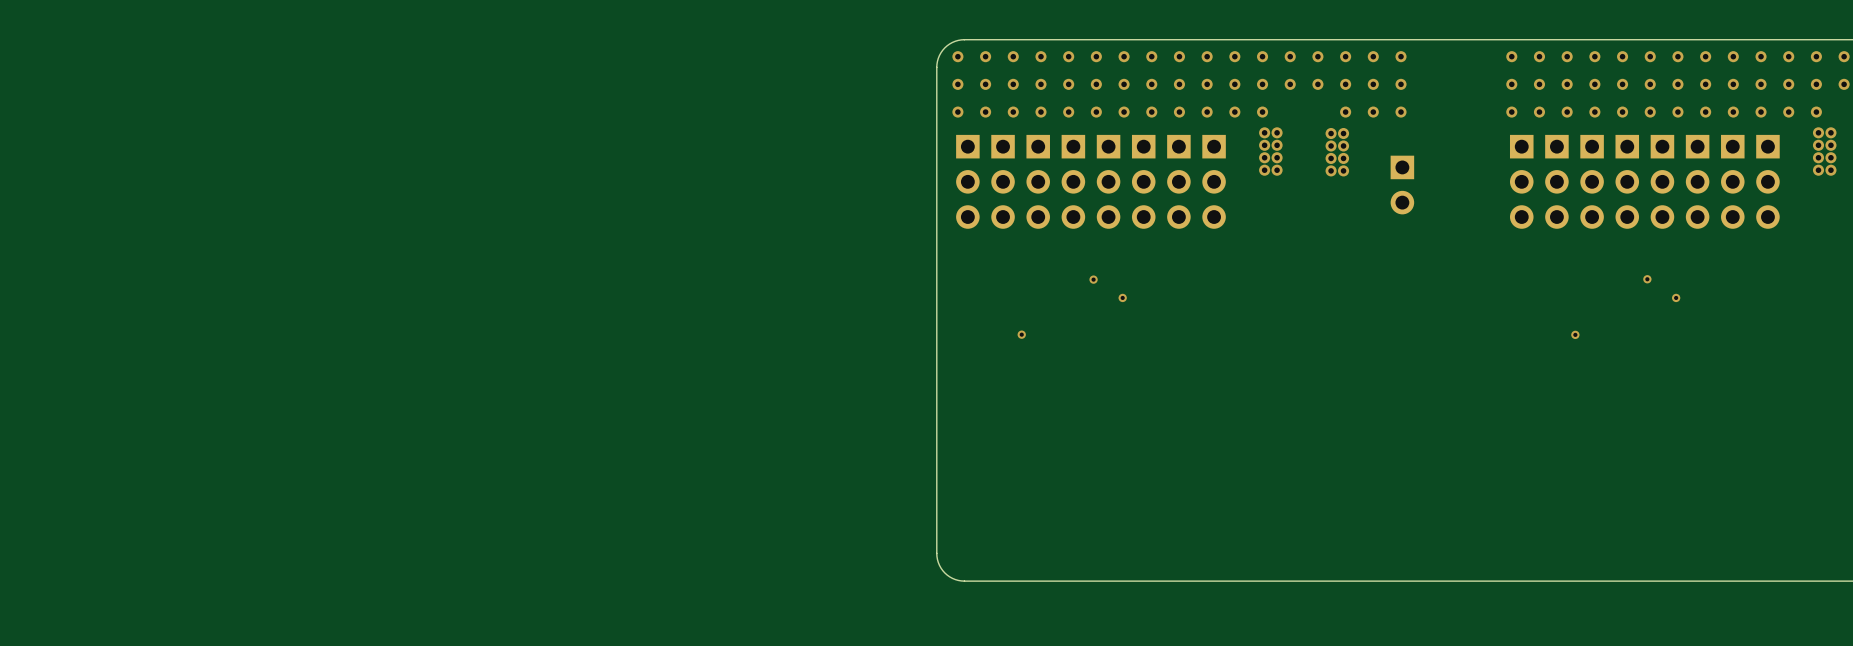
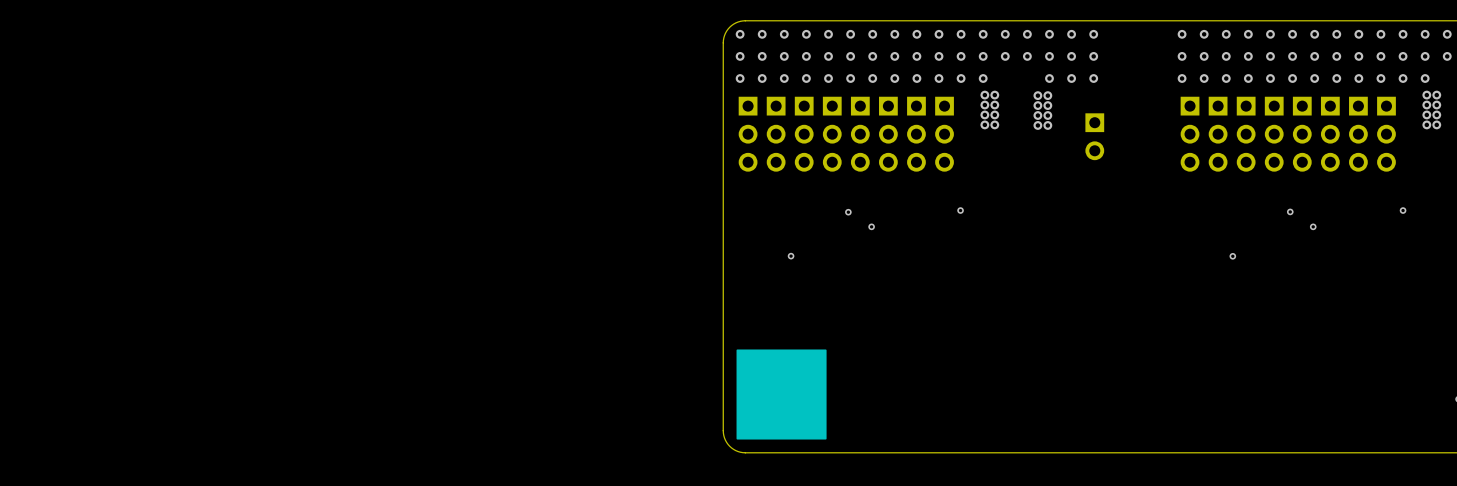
via: none -> (960, 210)
via: none -> (1403, 210)
drawing: none -> [736, 349, 827, 440]

